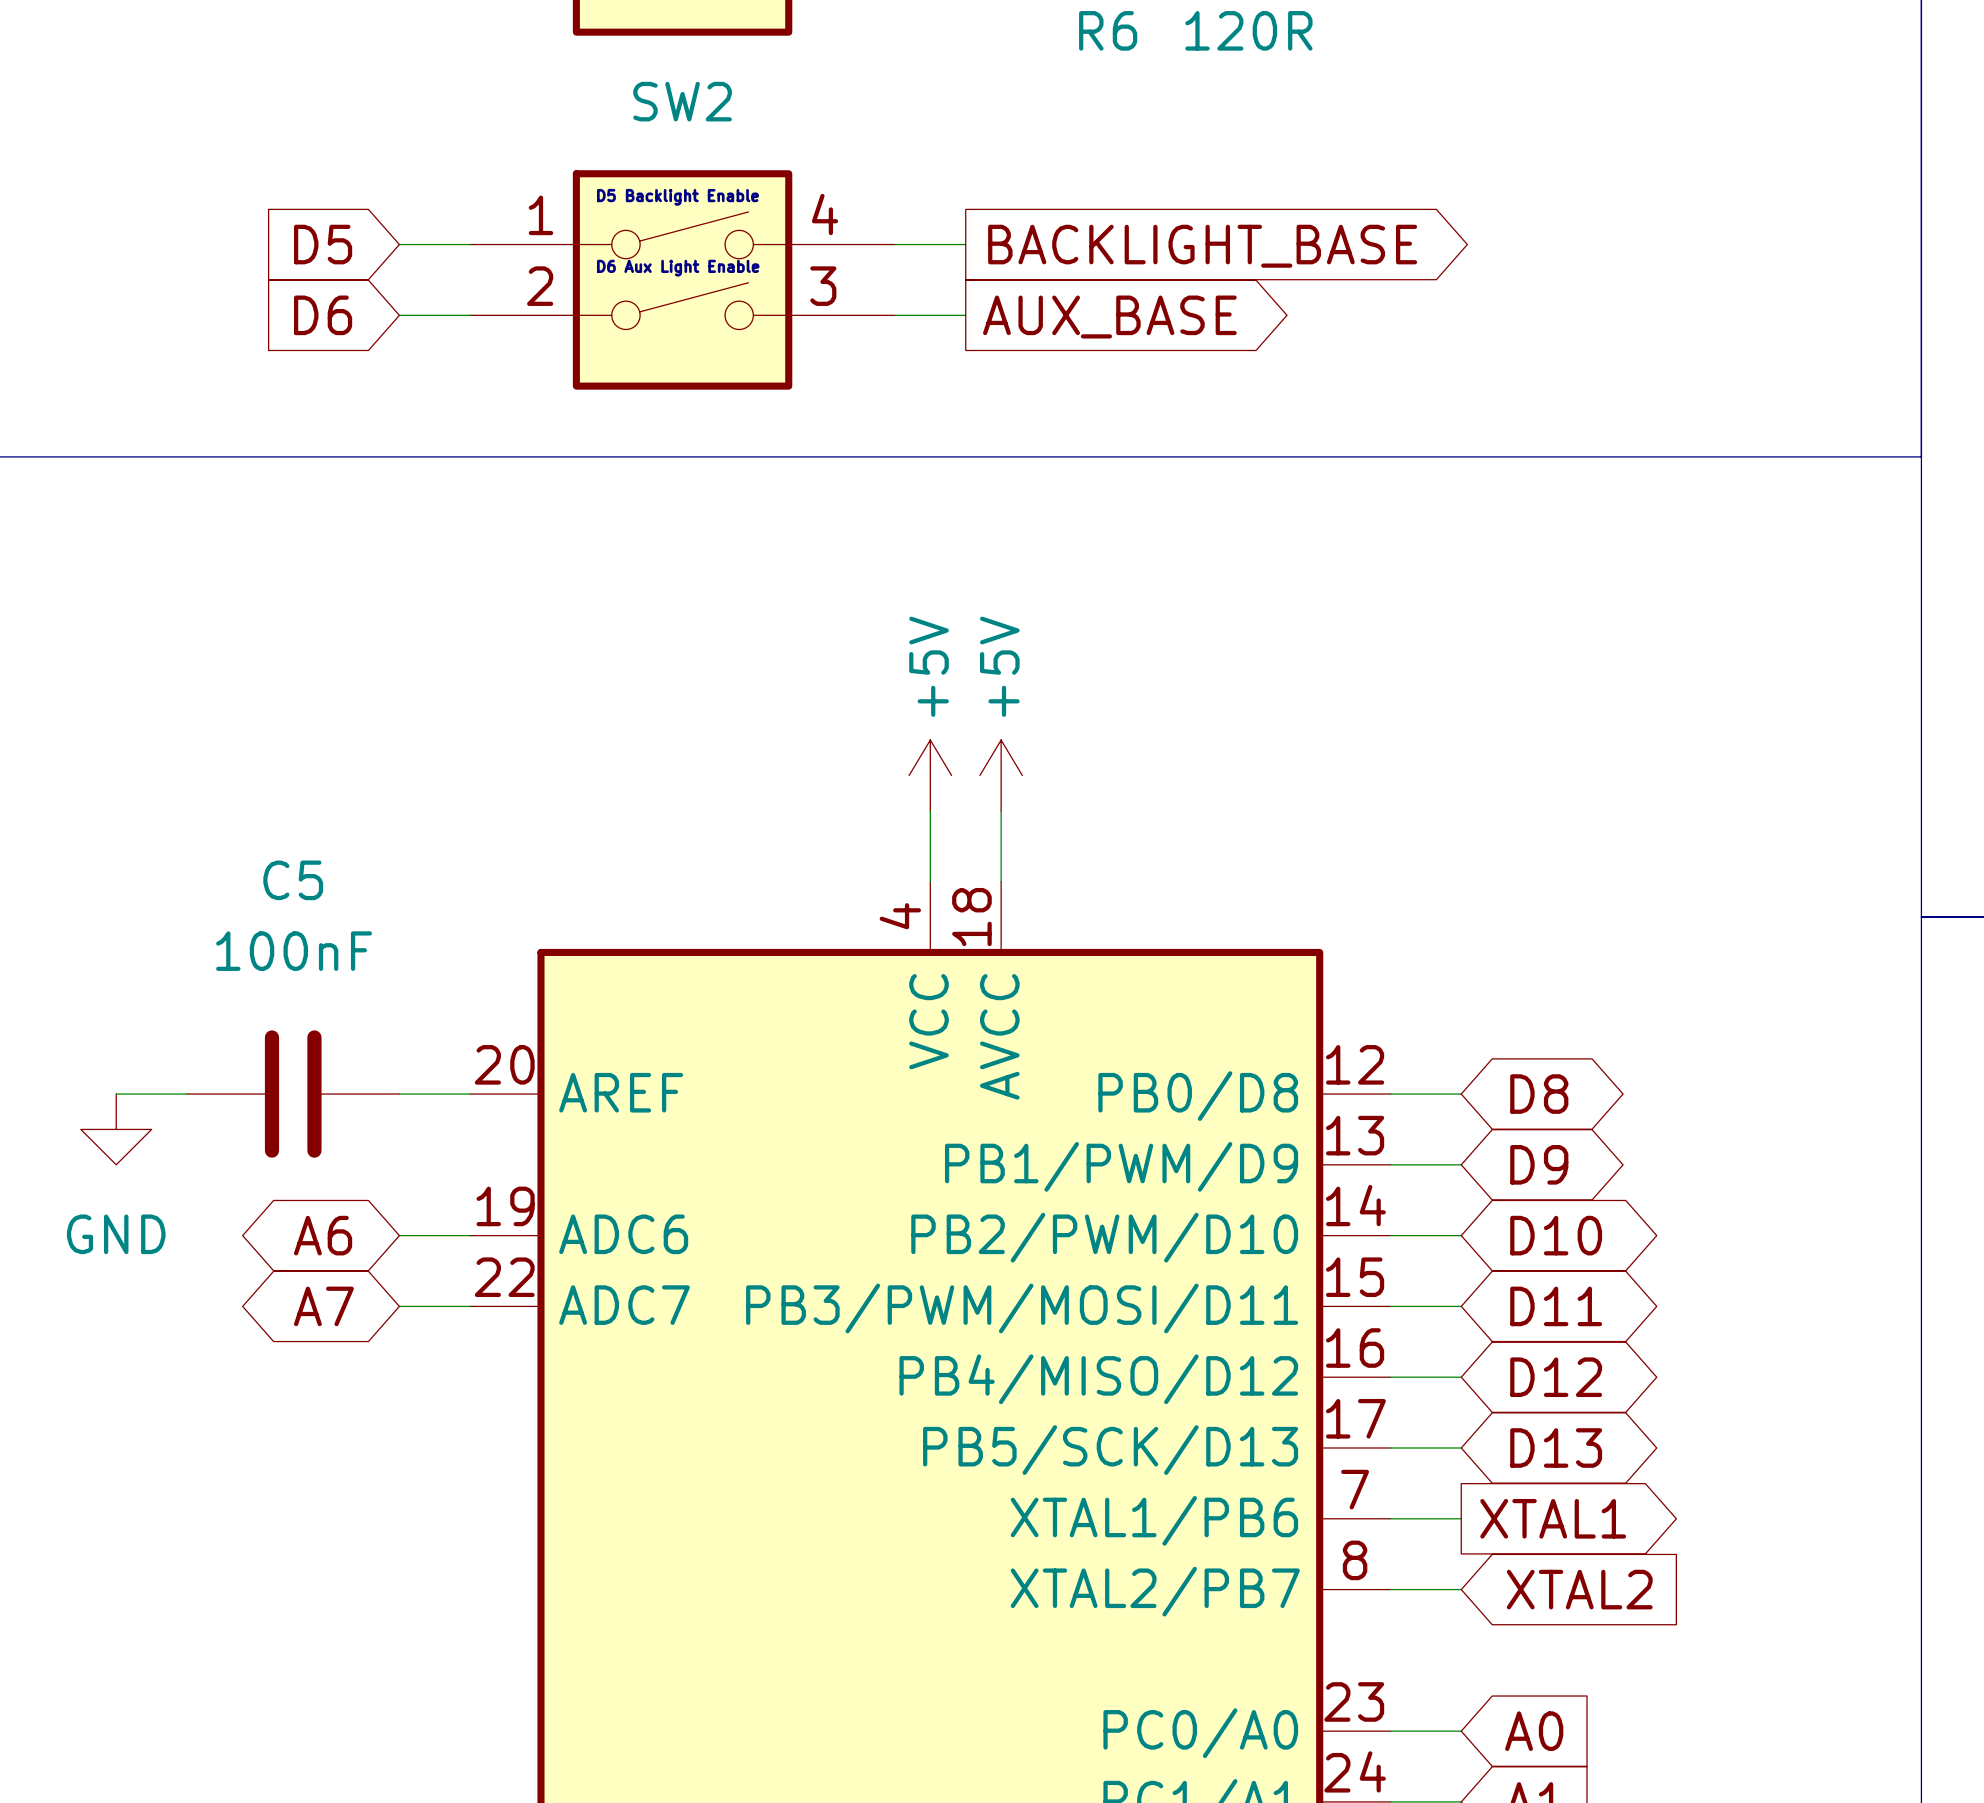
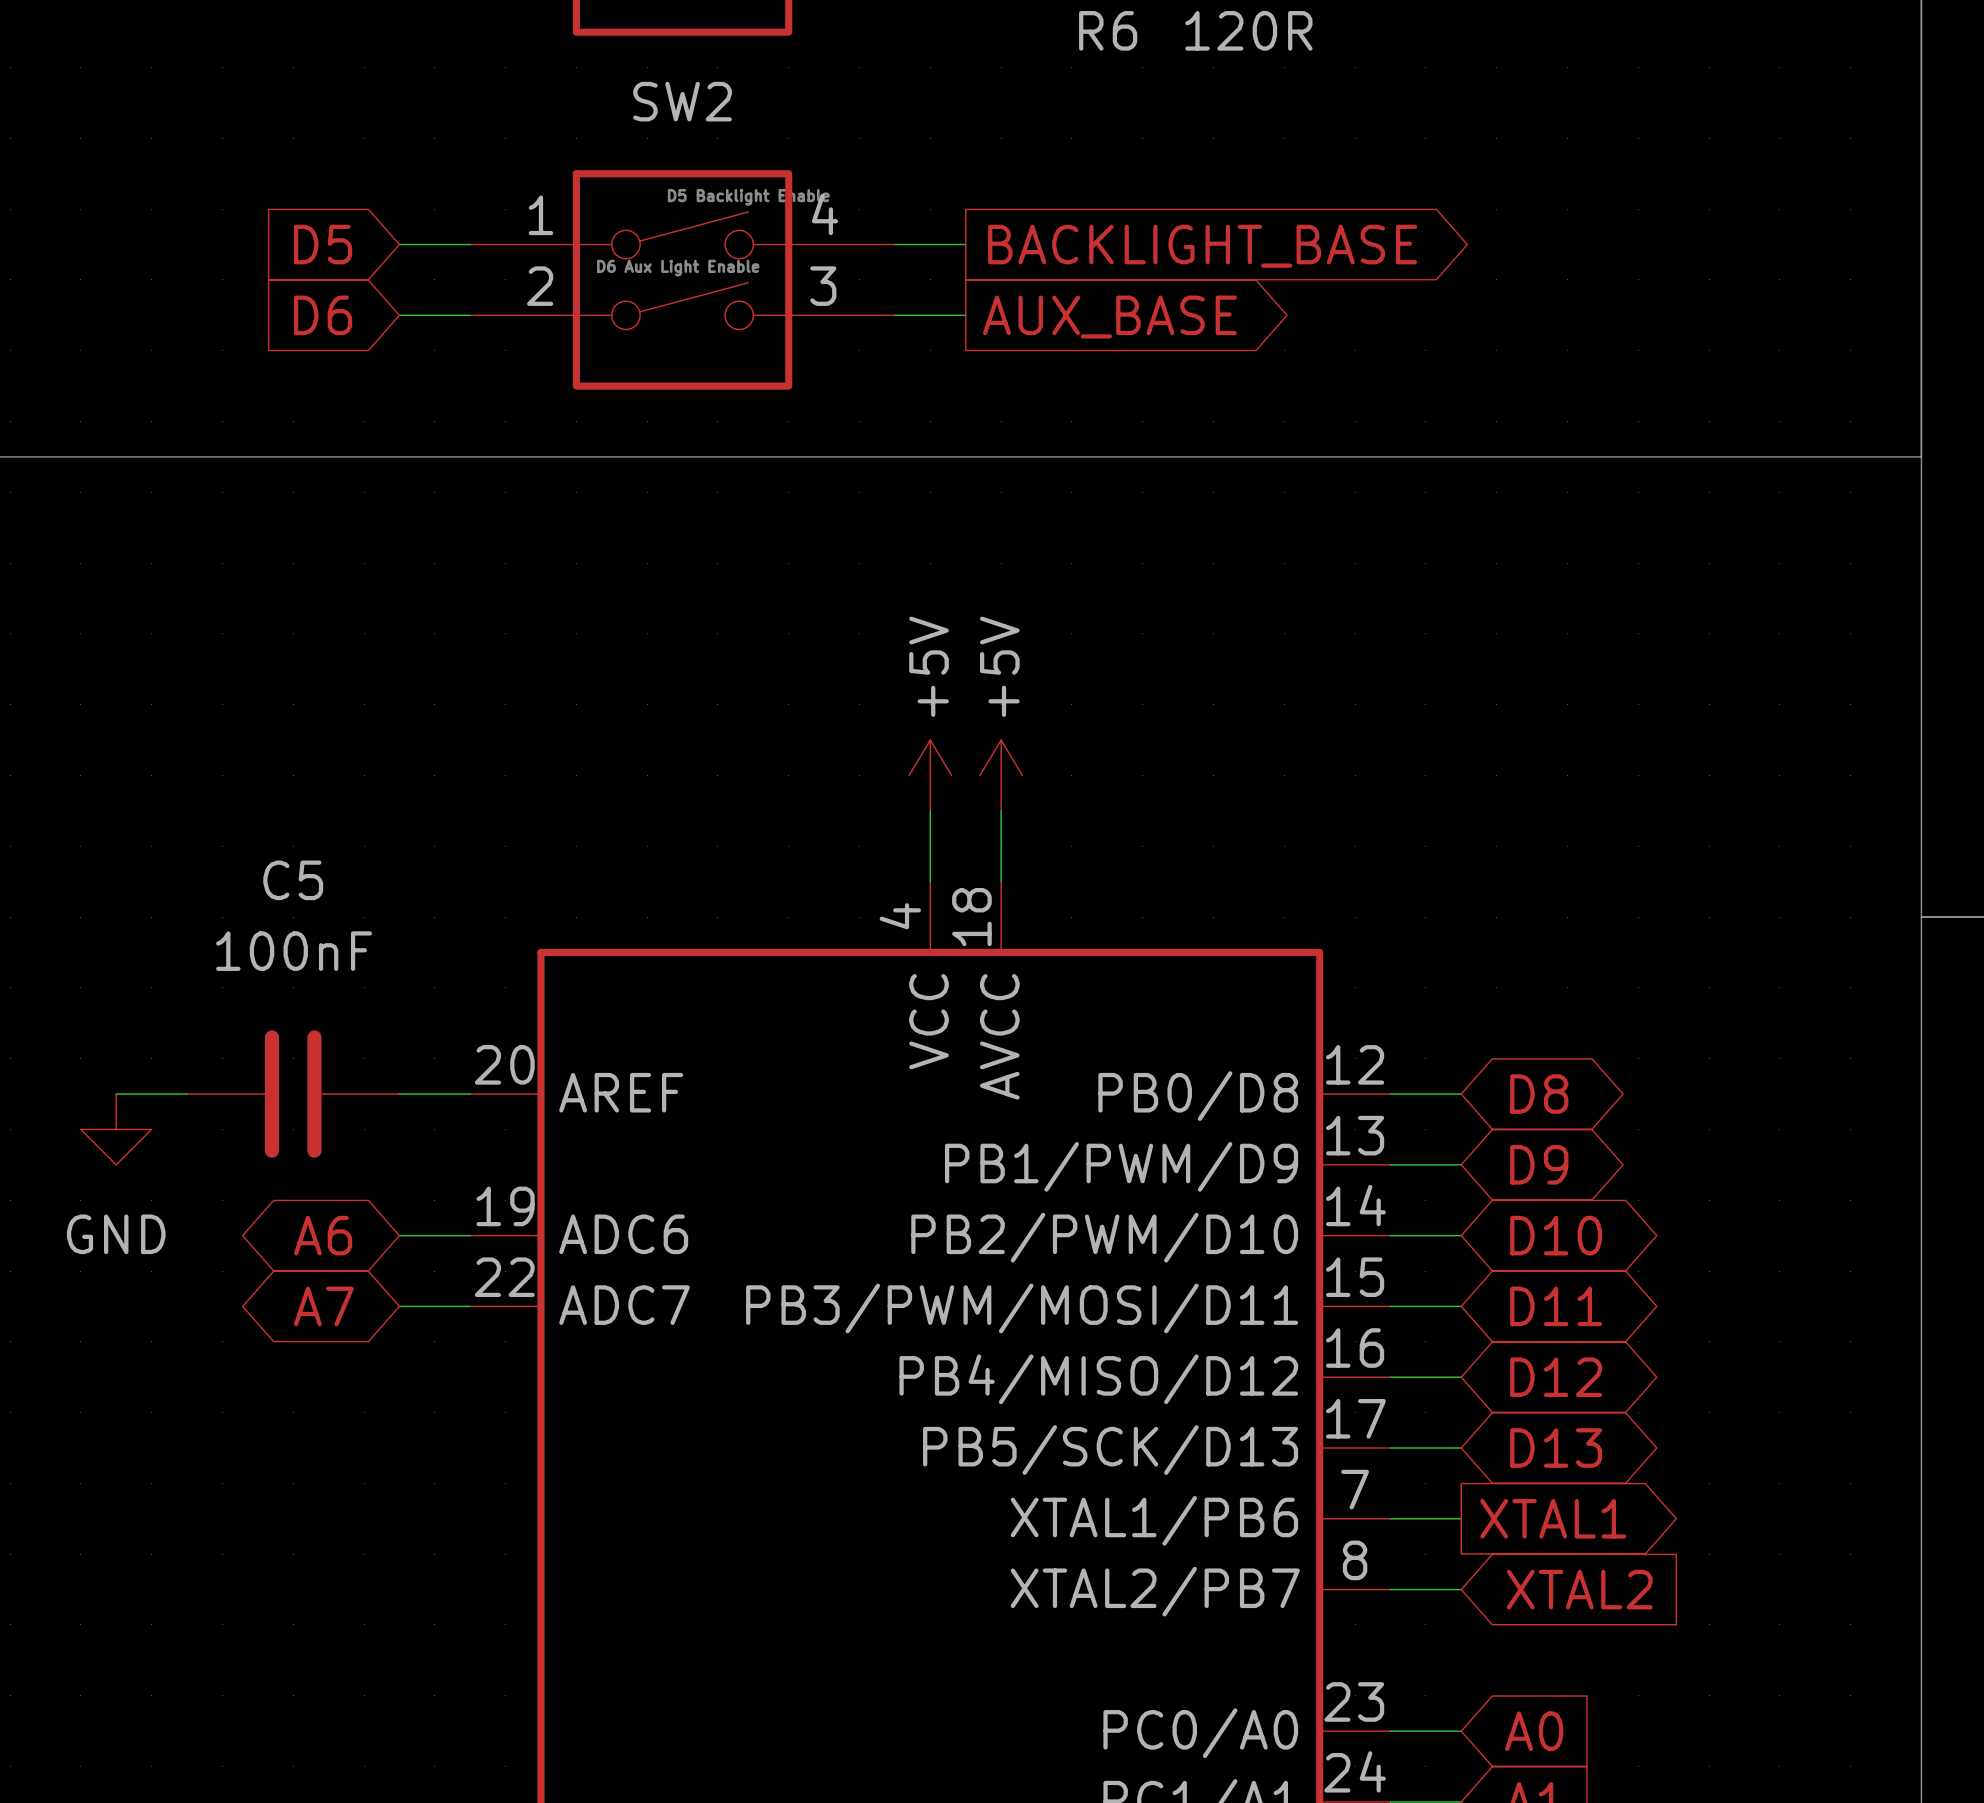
text position: D5 Backlight Enable (677, 197) -> D5 Backlight Enable (748, 197)

